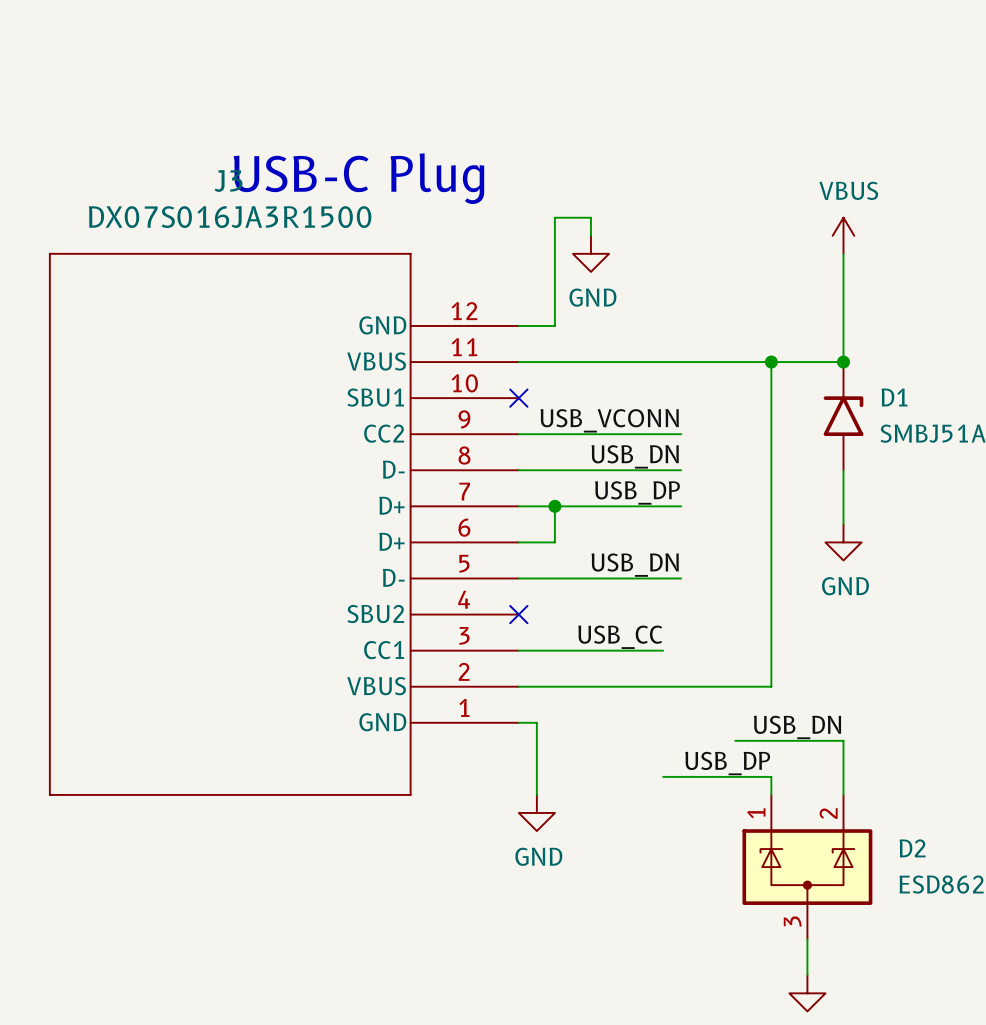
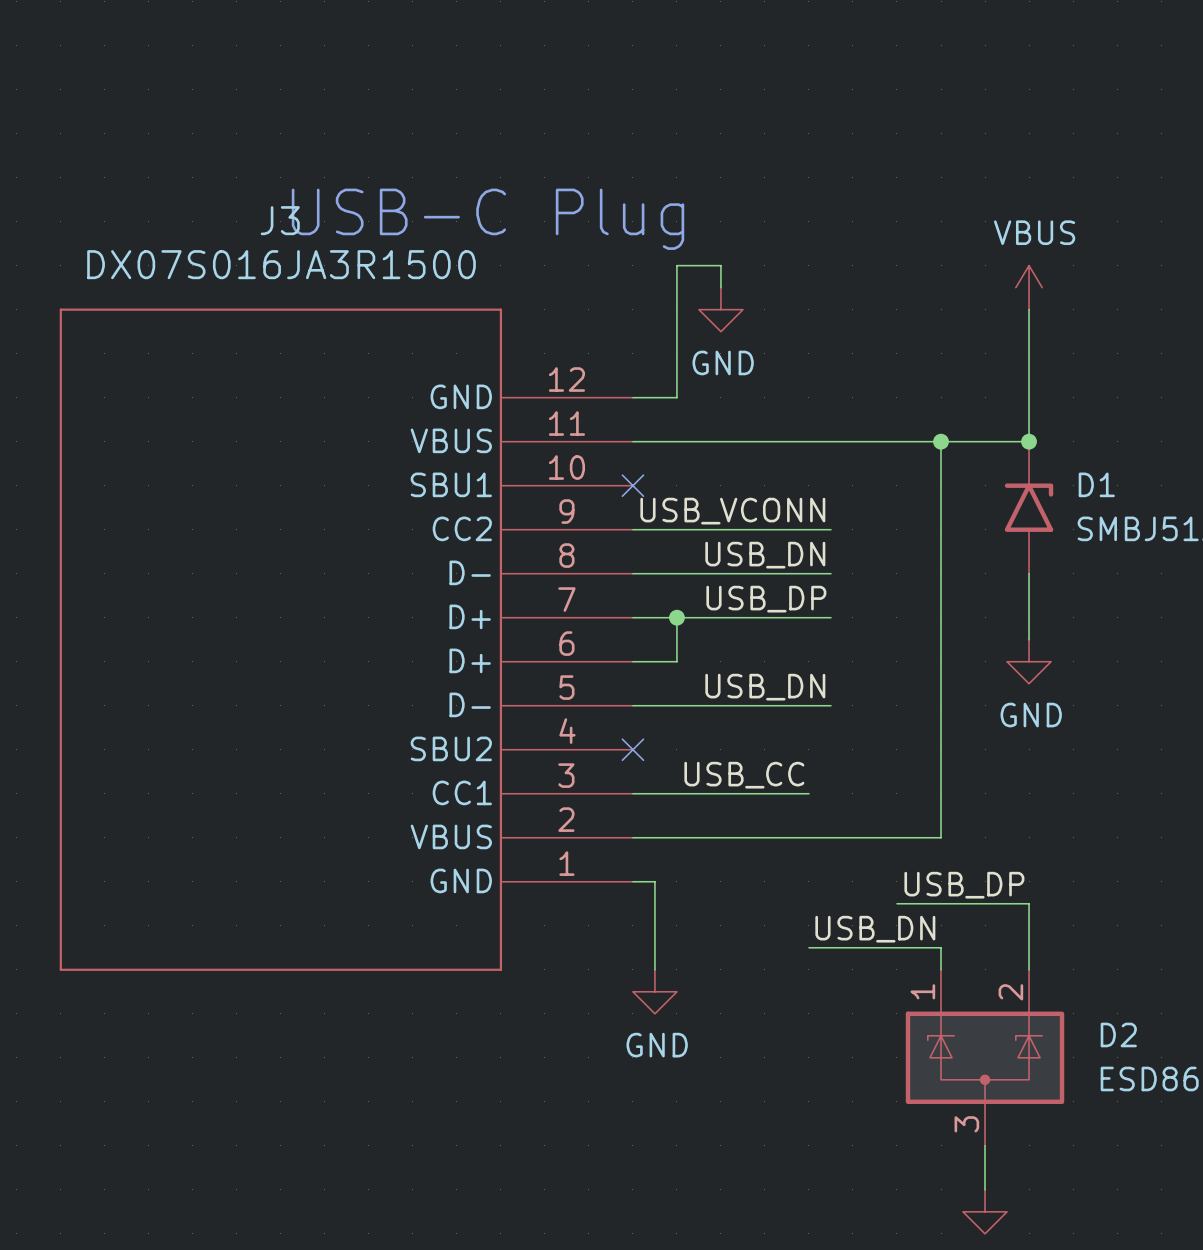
label: USB_DN (797, 727) -> USB_DP (964, 885)
label: USB_DP (727, 763) -> USB_DN (875, 929)

